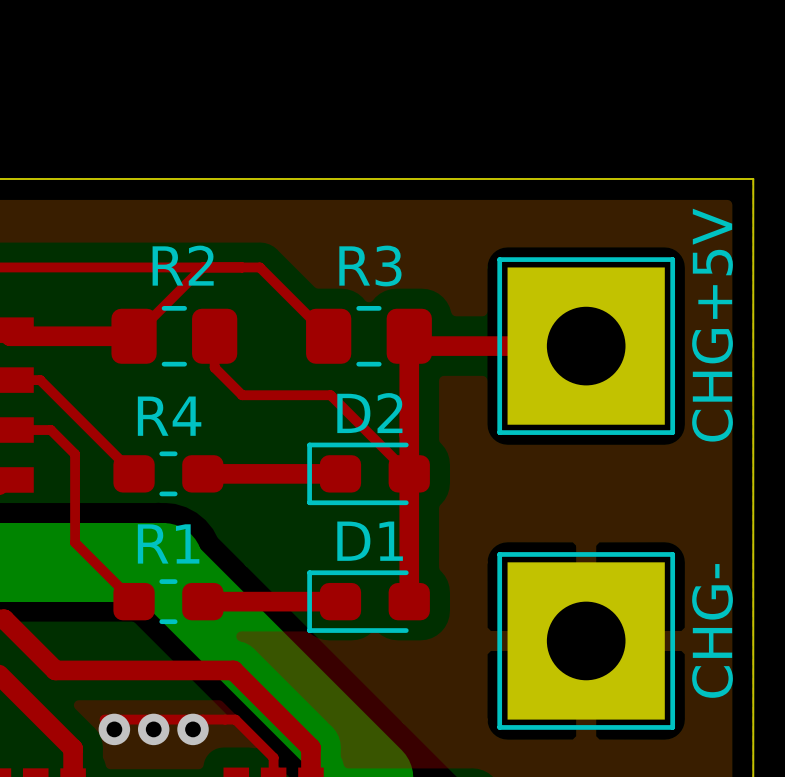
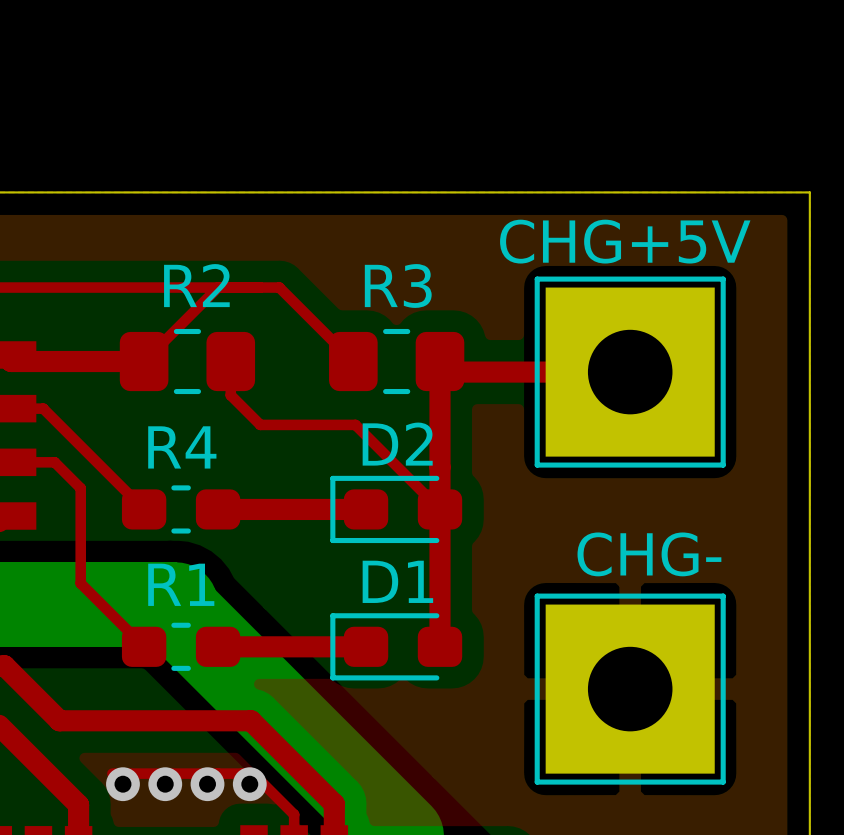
part value rotation: 0° (712, 325) -> 90° clockwise (625, 241)
part value rotation: 0° (712, 630) -> 90° clockwise (649, 554)
via: none -> (249, 784)

